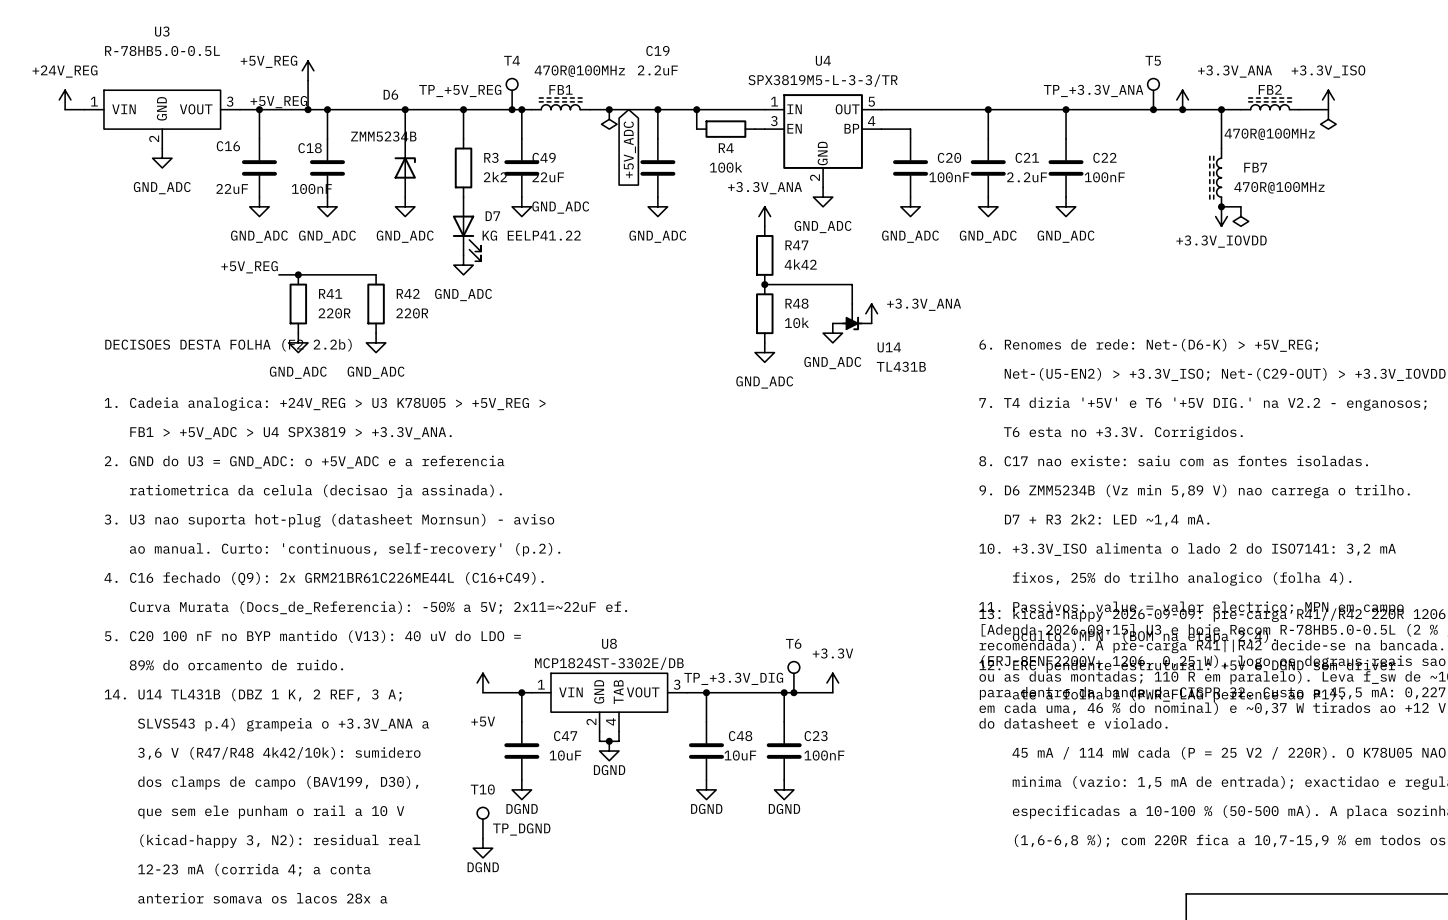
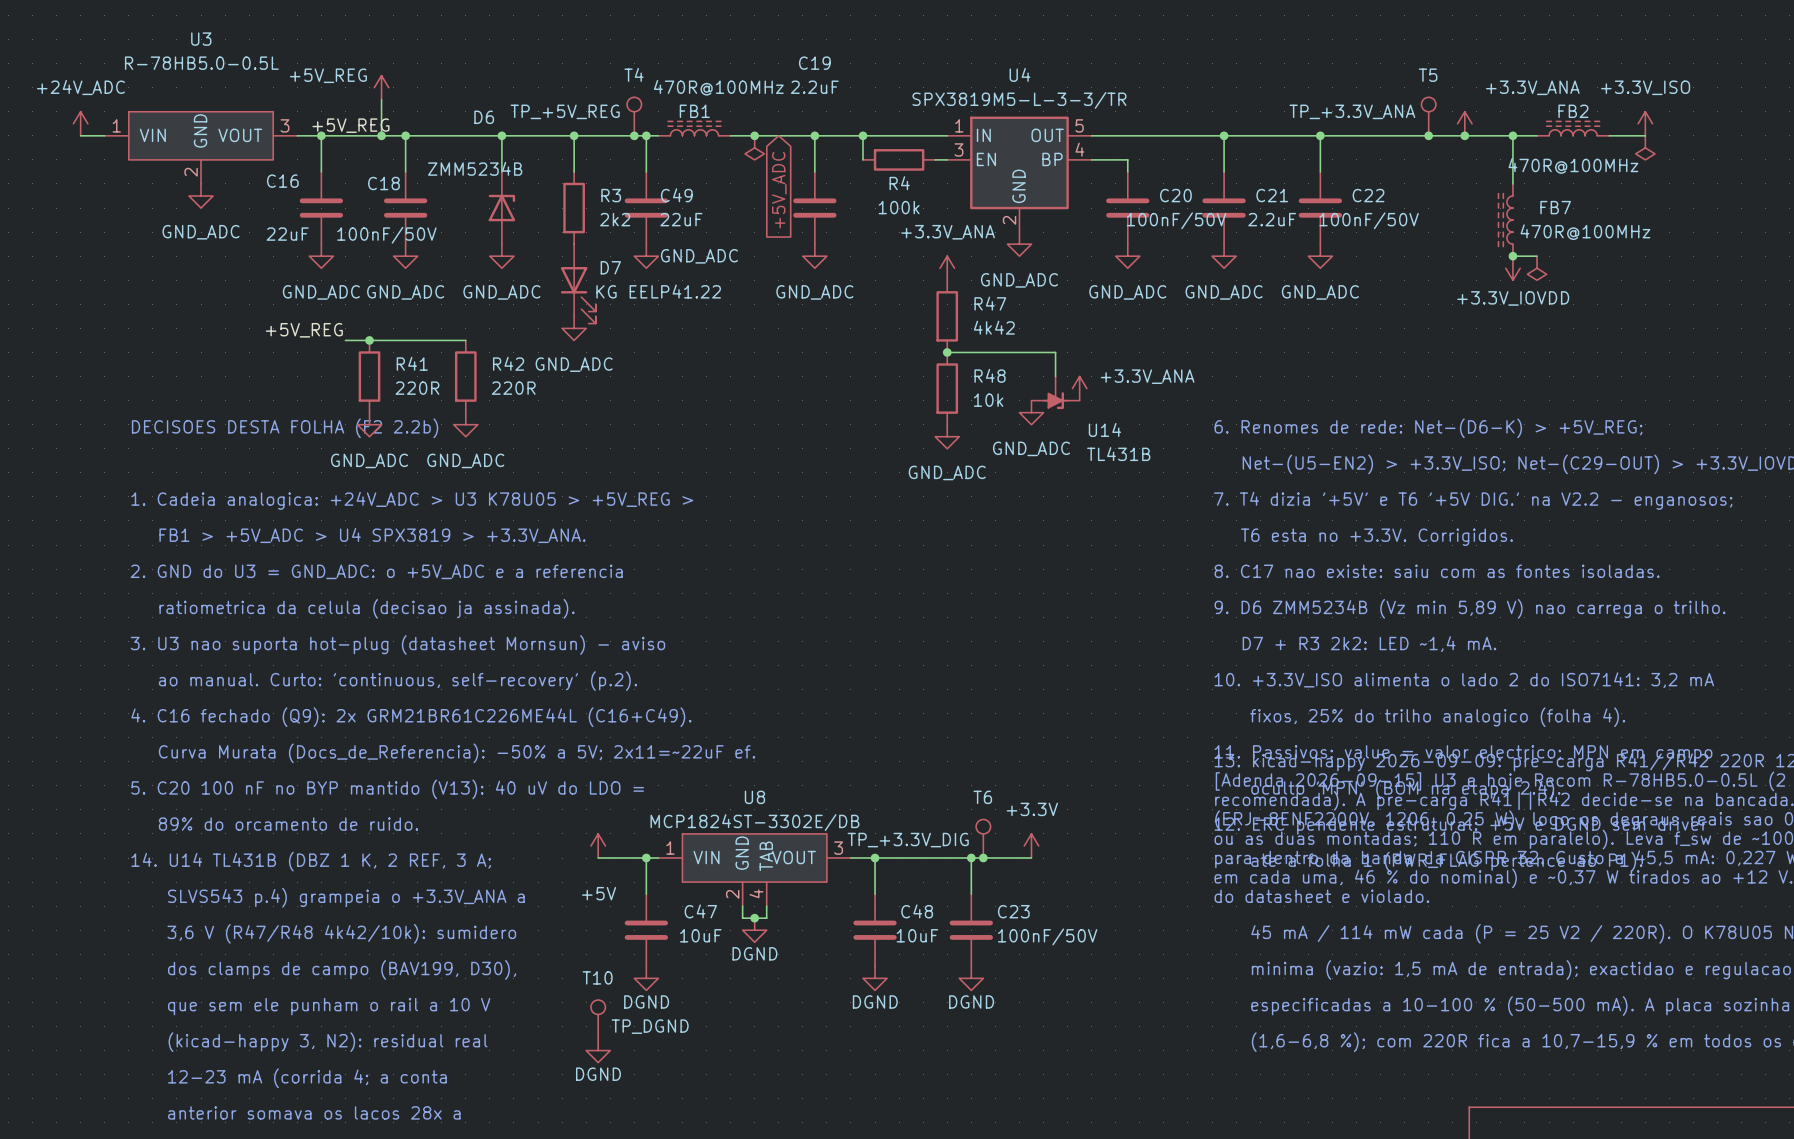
power symbol: +24V_REG (65, 99) -> +24V_ADC (80, 123)
C20 value: 100nF (949, 177) -> 100nF/50V (1176, 220)
C22 value: 100nF (1104, 177) -> 100nF/50V (1369, 220)
C18 value: 100nF (311, 188) -> 100nF/50V (386, 235)
text: 1. Cadeia analogica: +24V_REG > U3 K78U05 > +5V_REG > (325, 404) -> 1. Cadeia analogica: +24V_ADC > U3 K78U05 > +5V_REG > (412, 500)
C23 value: 100nF (824, 755) -> 100nF/50V (1047, 936)

